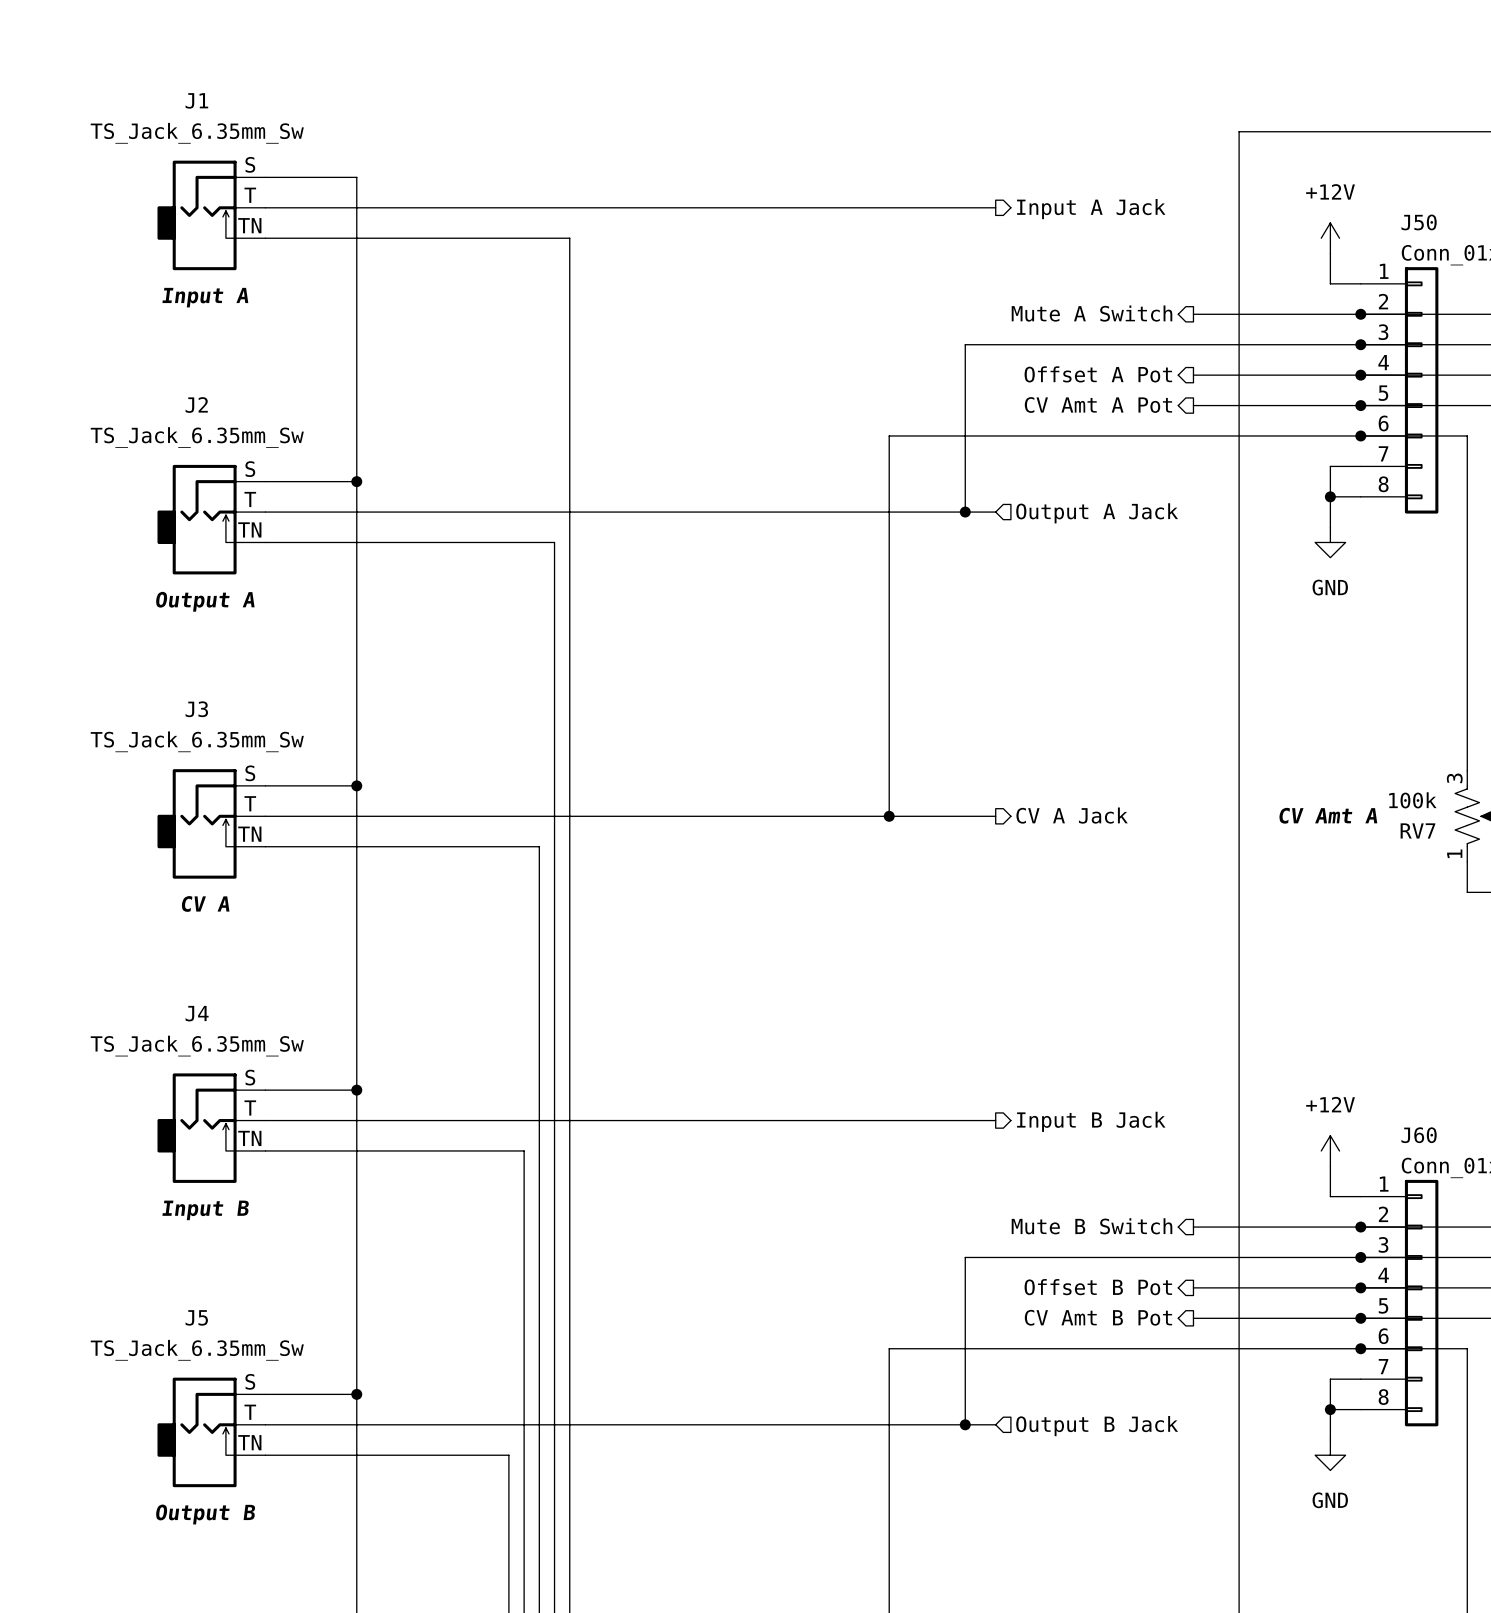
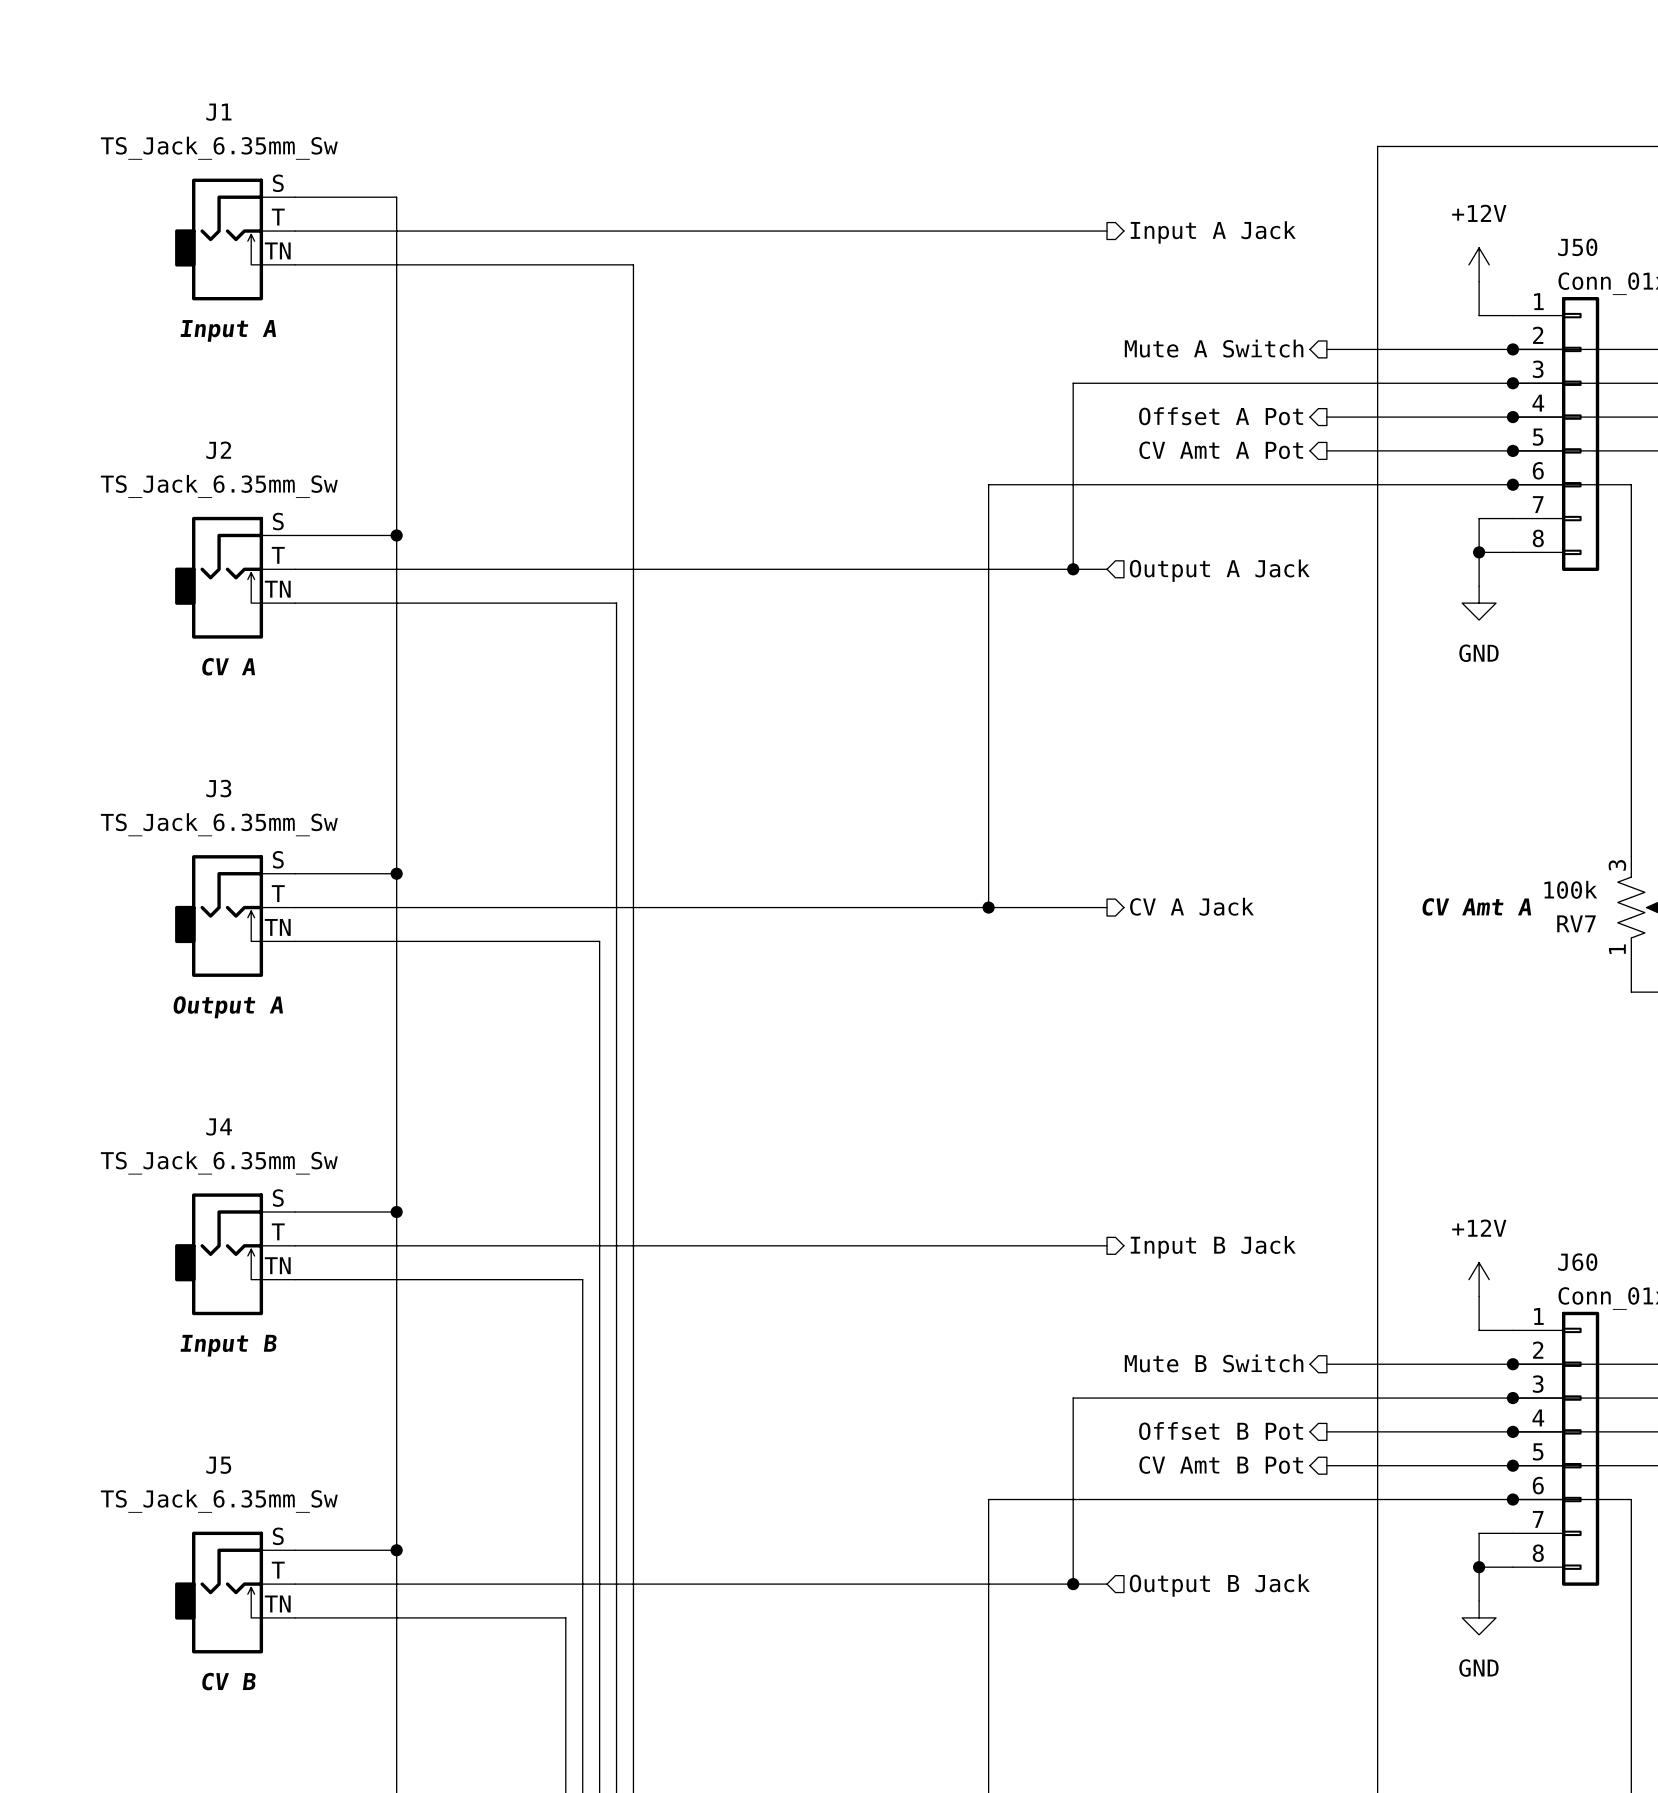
J2 text: Output A (205, 601) -> CV A (228, 666)
J3 text: CV A (205, 903) -> Output A (228, 1007)
J5 text: Output B (205, 1514) -> CV B (228, 1681)

